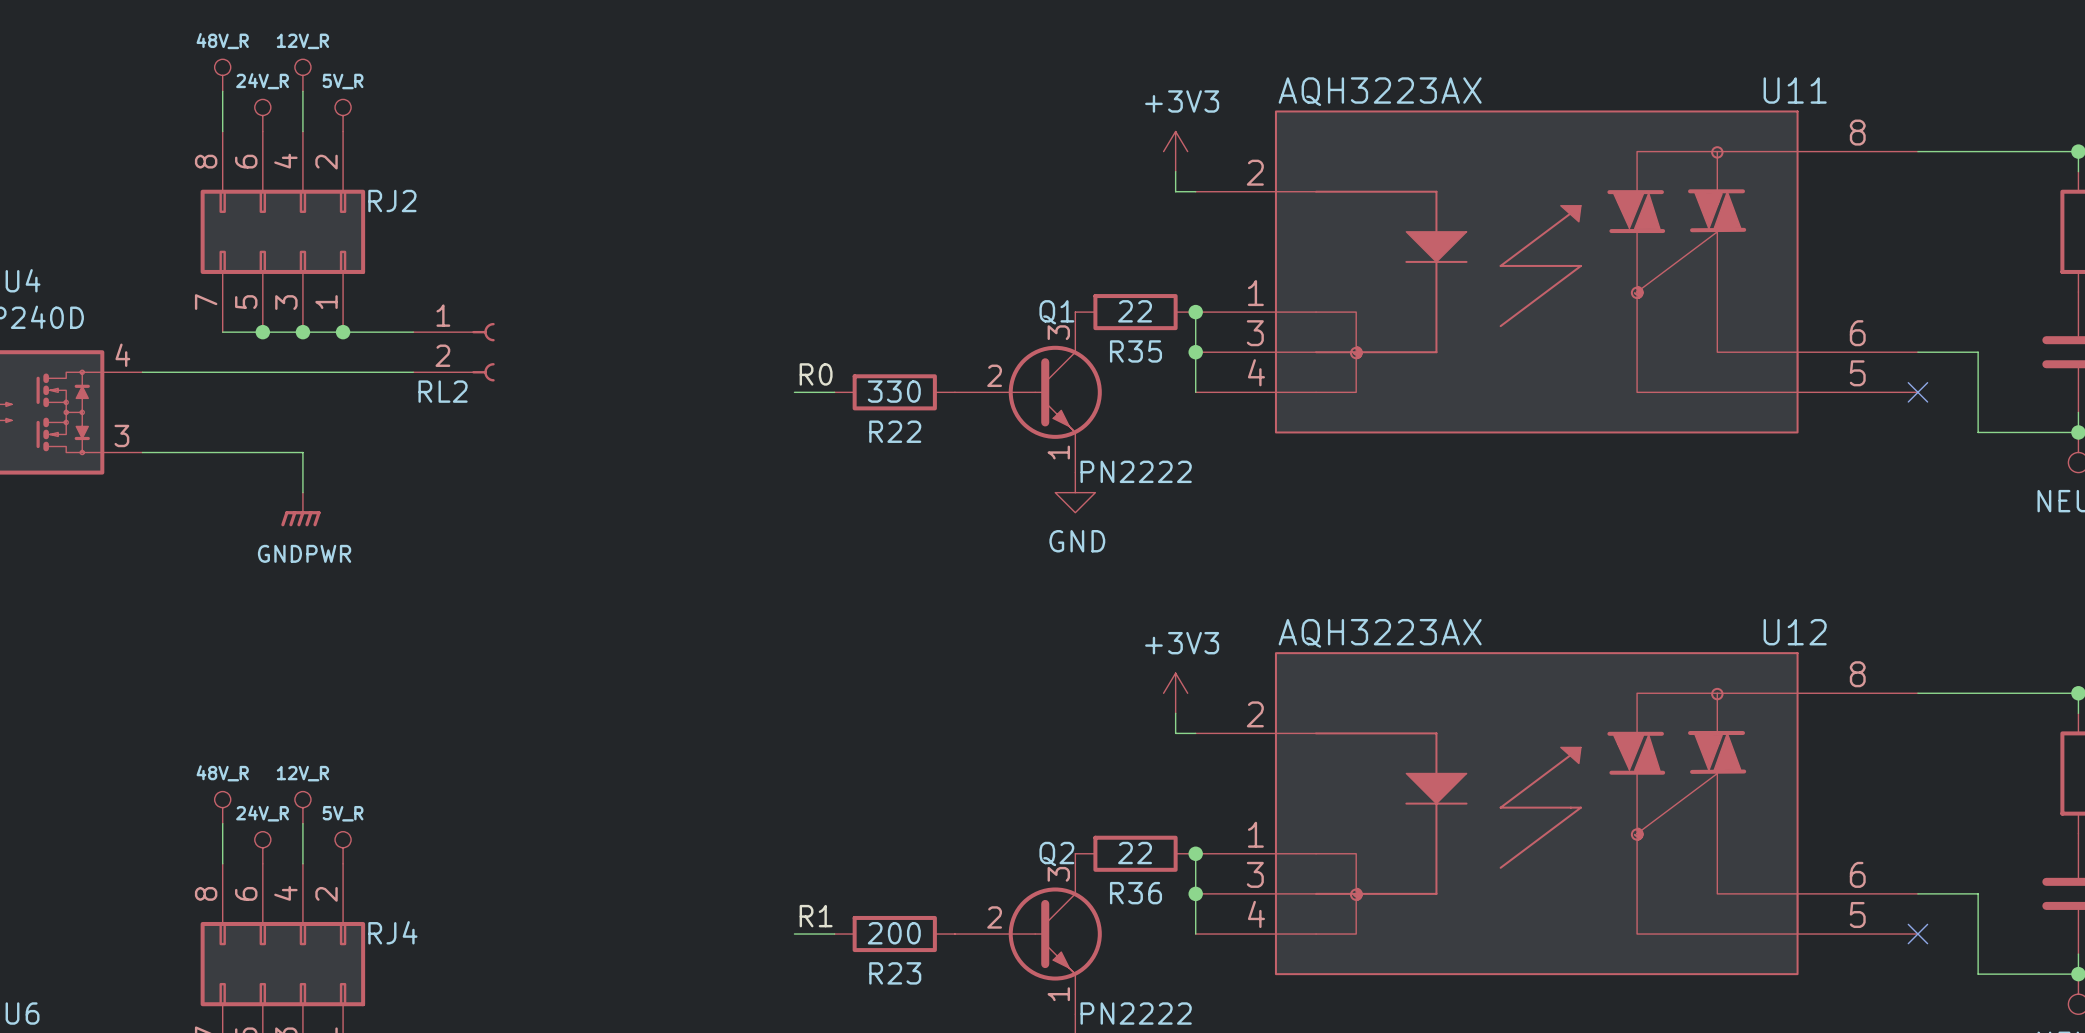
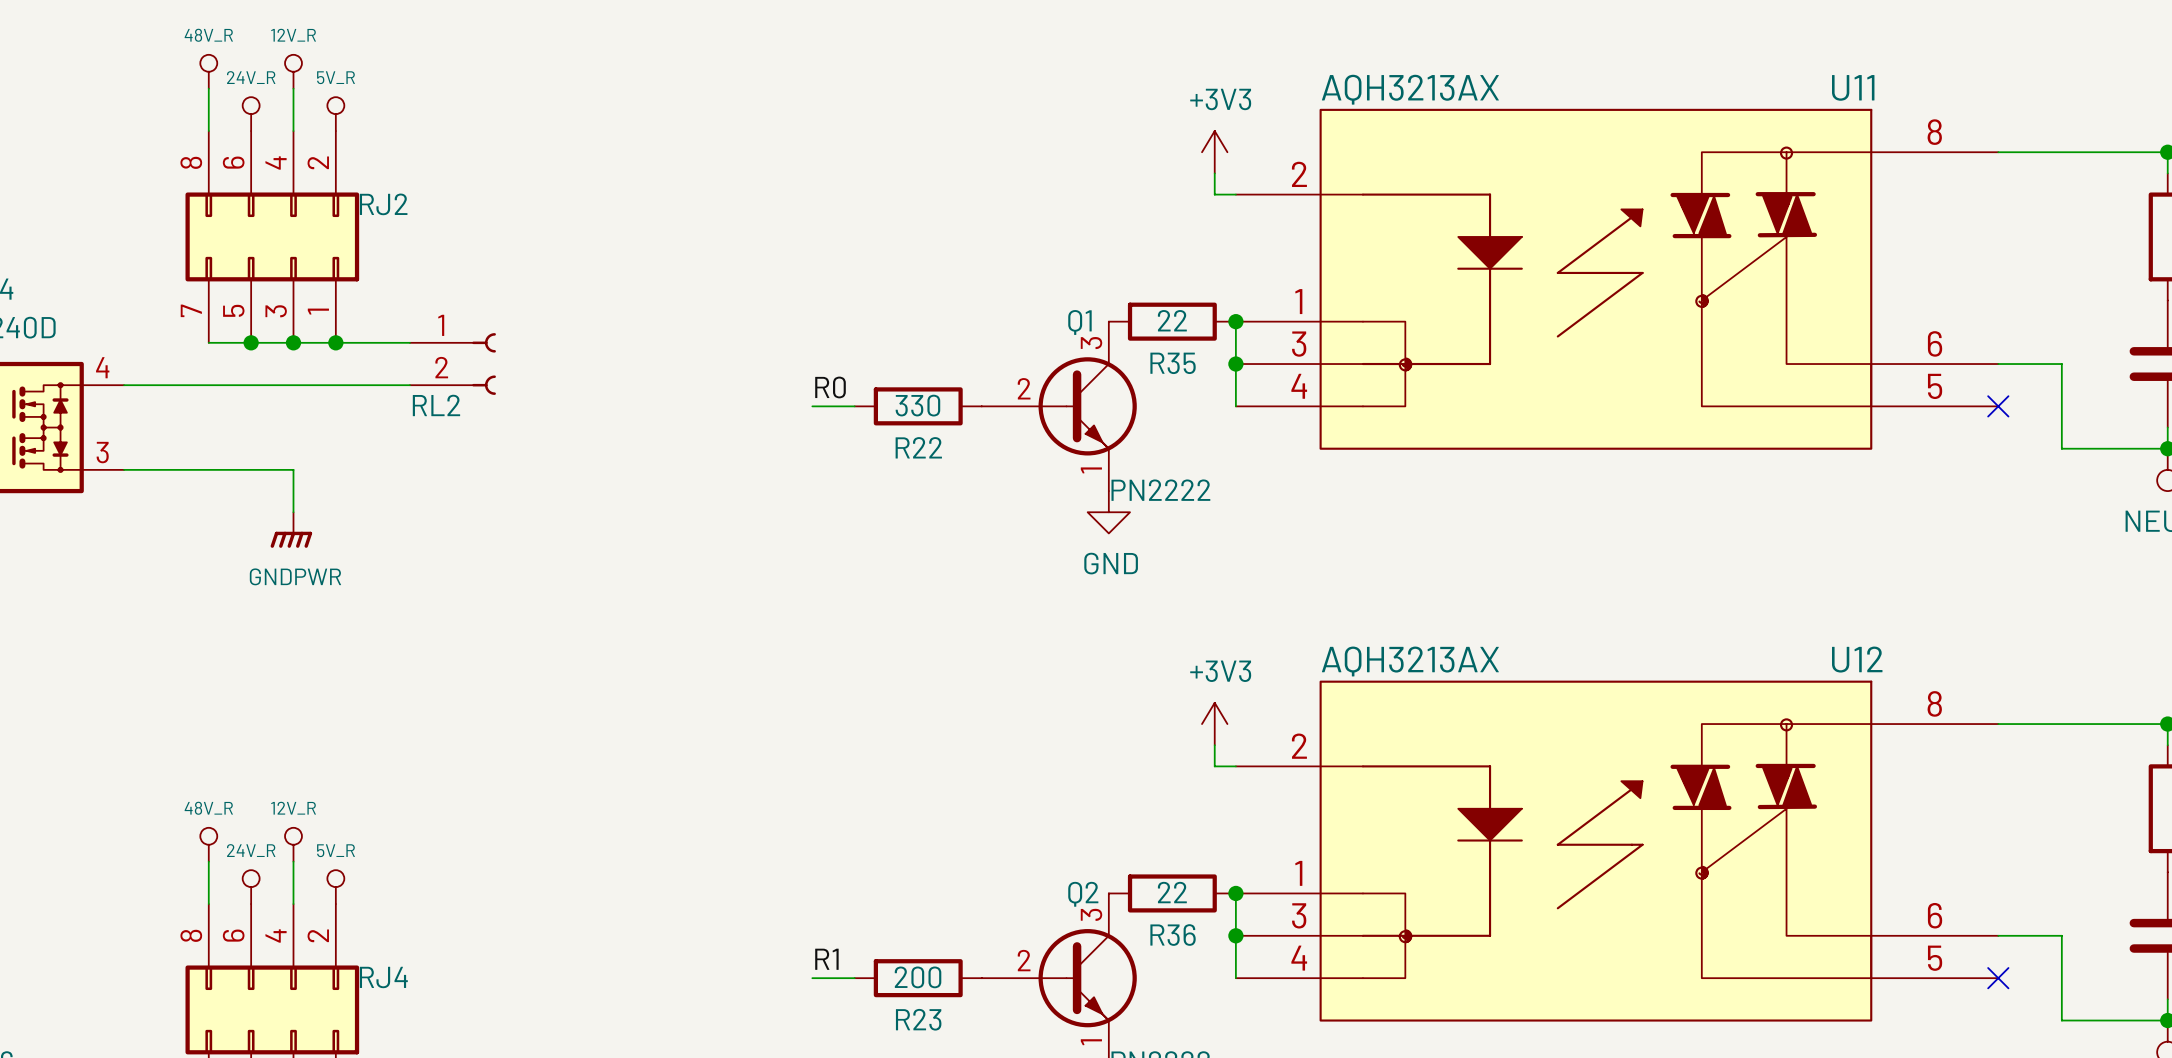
U11 value: AQH3223AX (1380, 91) -> AQH3213AX (1410, 89)
U12 value: AQH3223AX (1380, 633) -> AQH3213AX (1410, 661)

